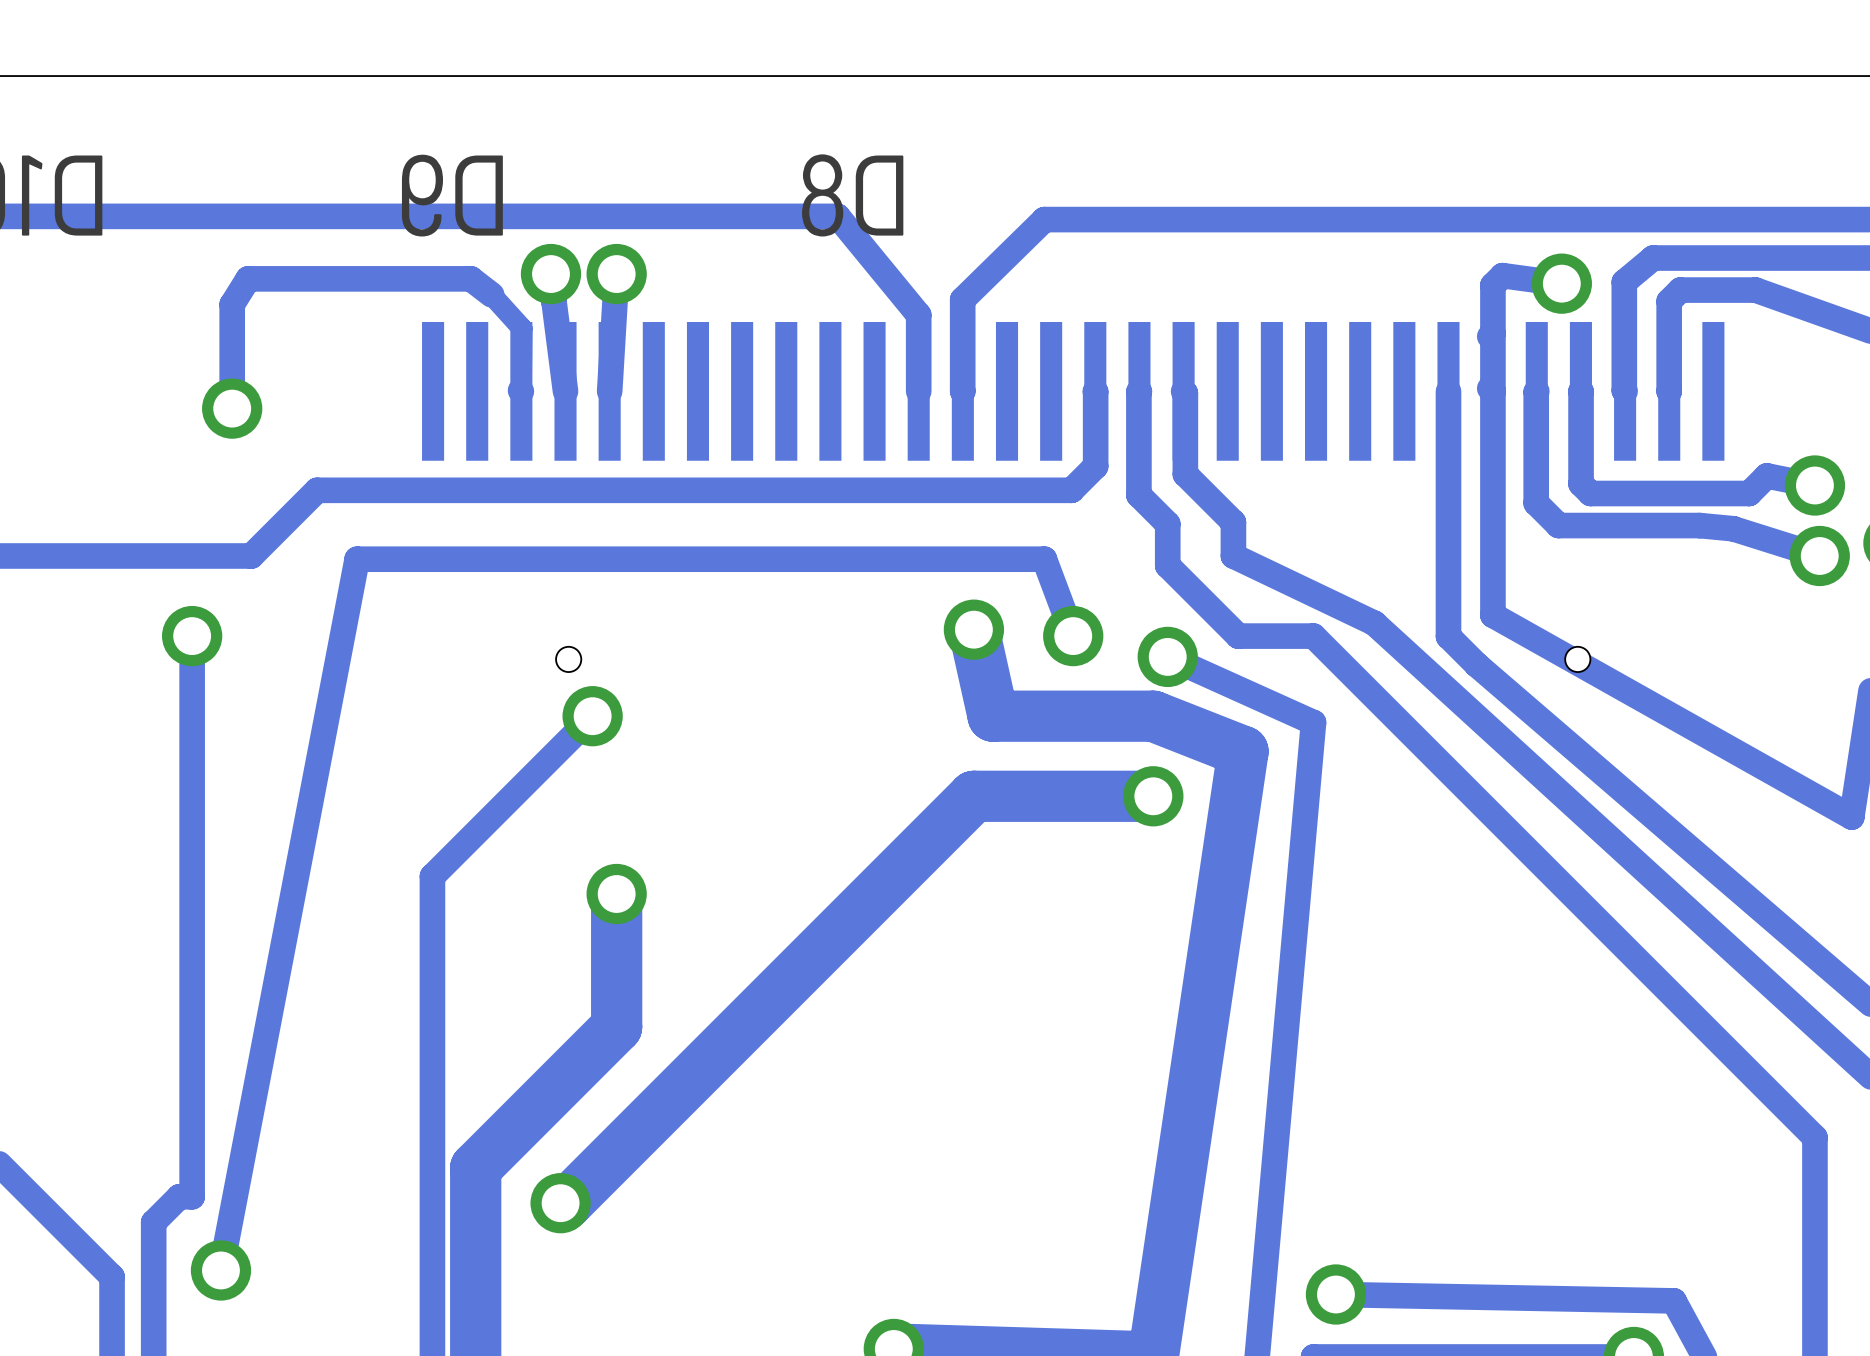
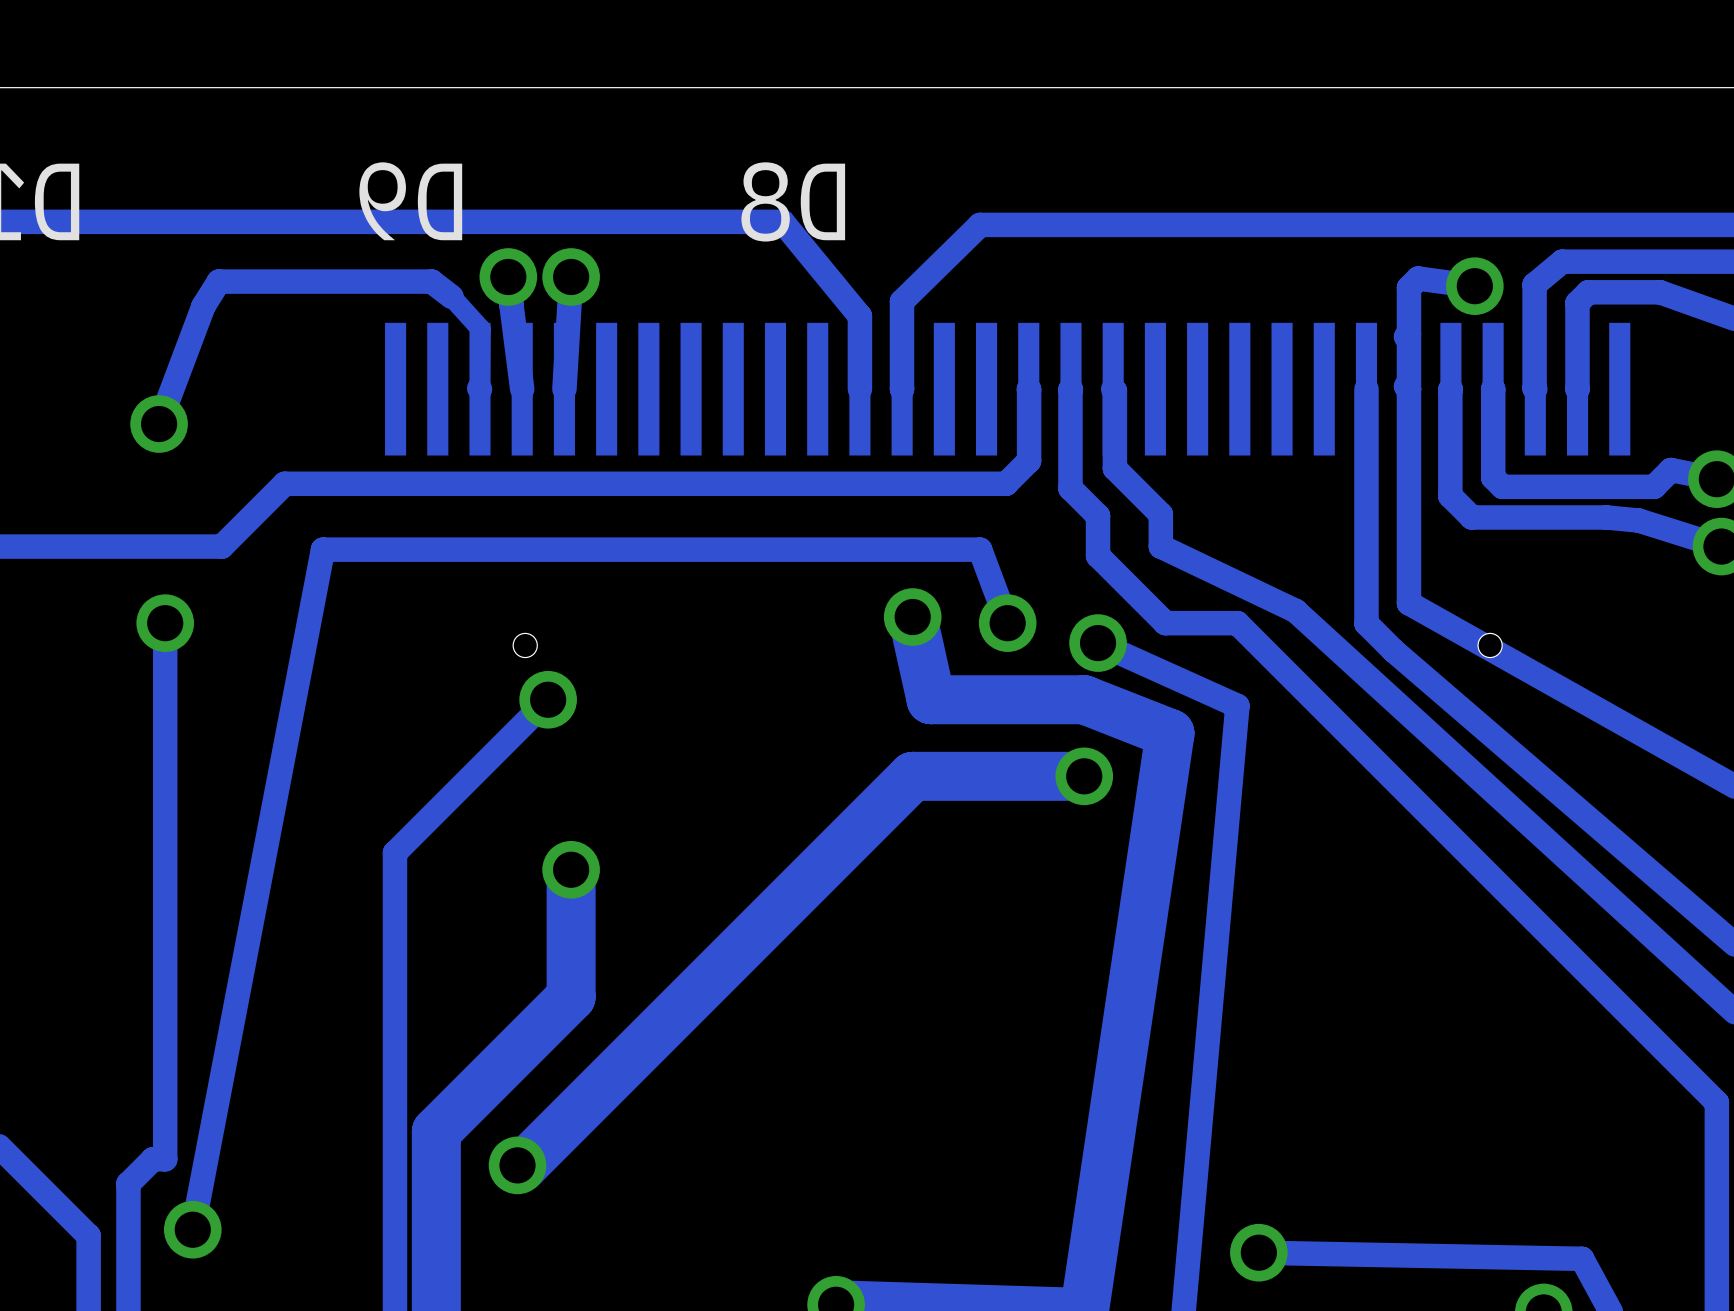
track: (232, 304) (232, 408) -> (203, 306) (159, 424)
via position: (232, 408) -> (159, 424)

